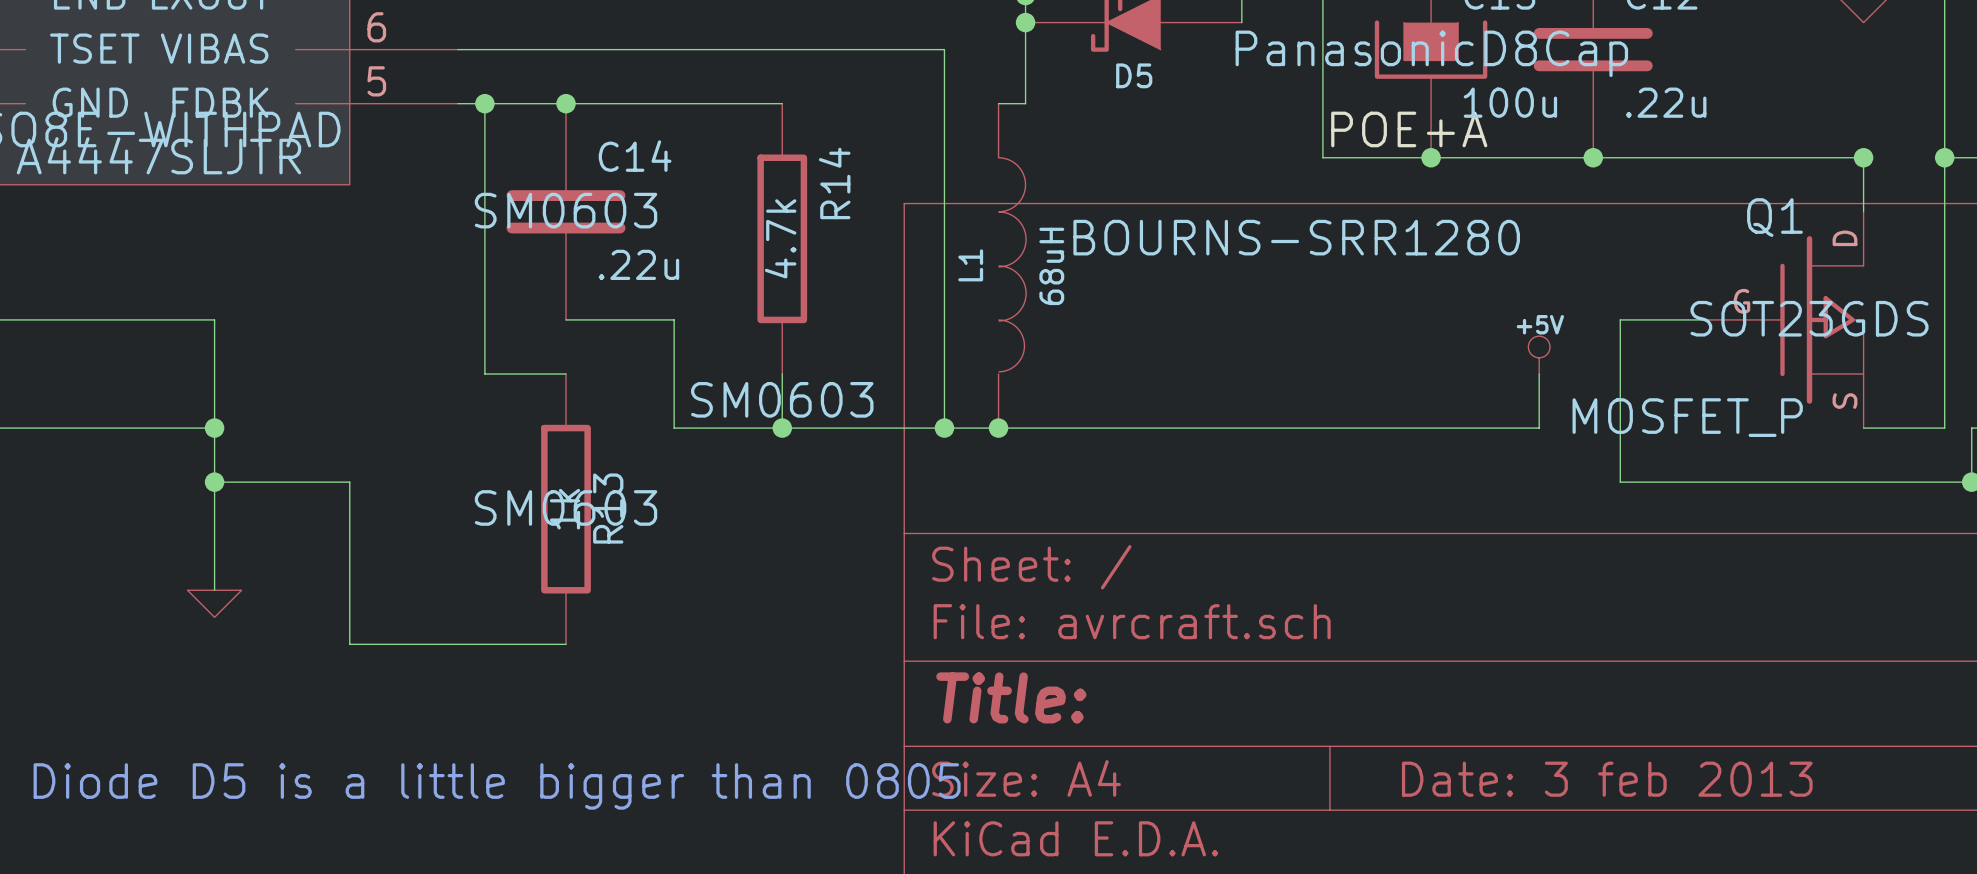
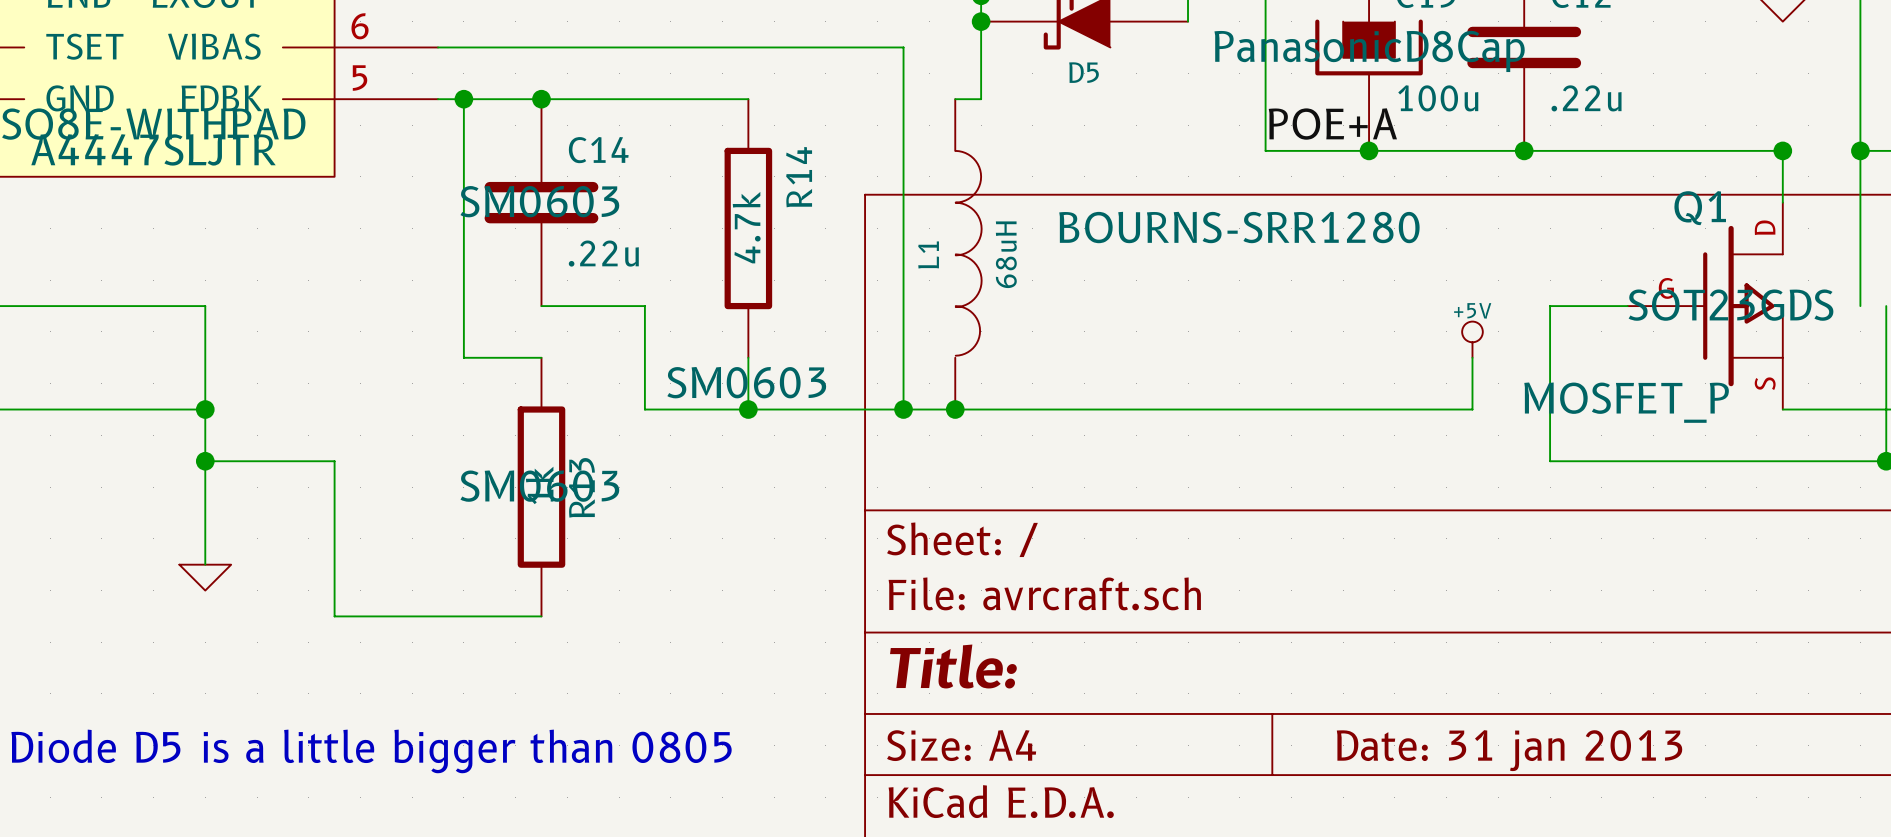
wire: (1944, 319) (1944, 428) -> (1886, 306) (1886, 409) (1860, 409)
title block: Date: 3 feb 2013 (1607, 779) -> Date: 31 jan 2013 (1509, 750)

